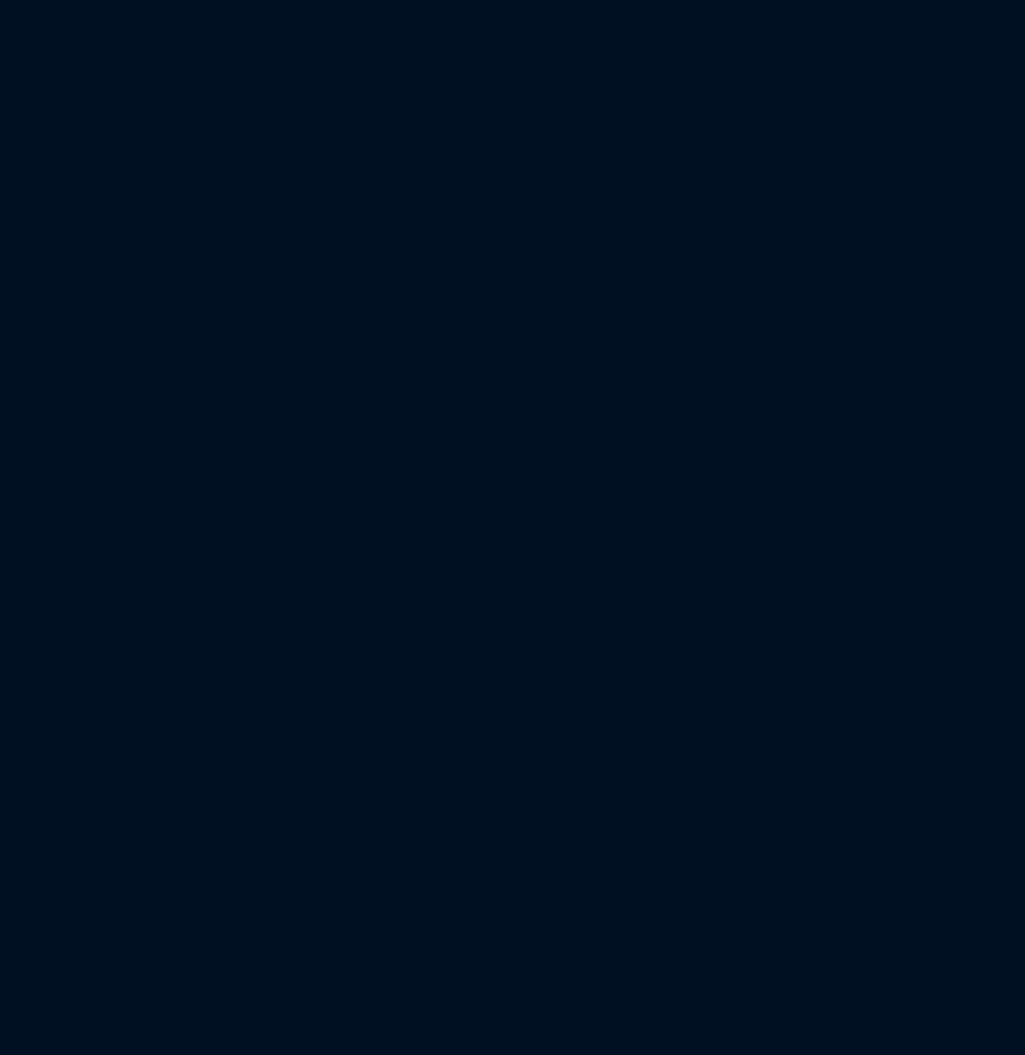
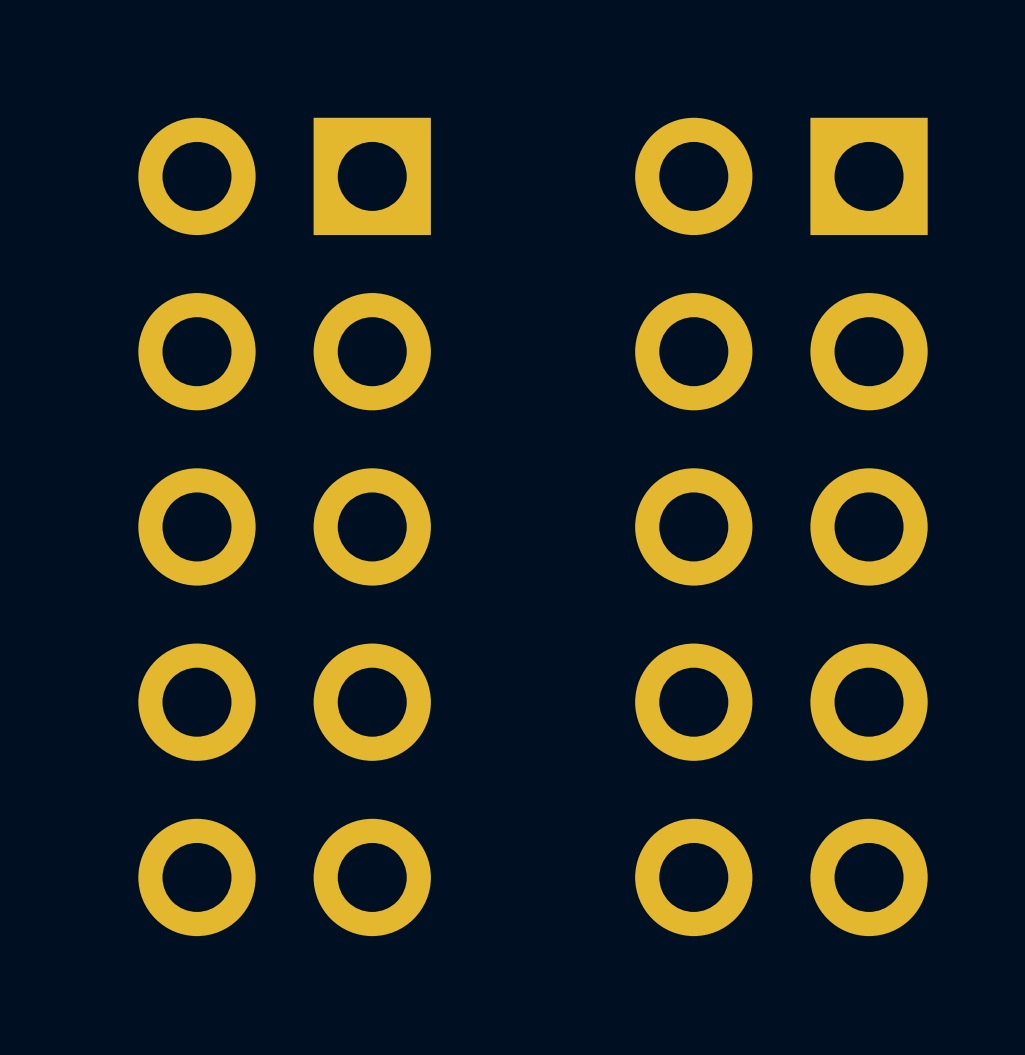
part: none -> (284, 526)
part: none -> (781, 526)

